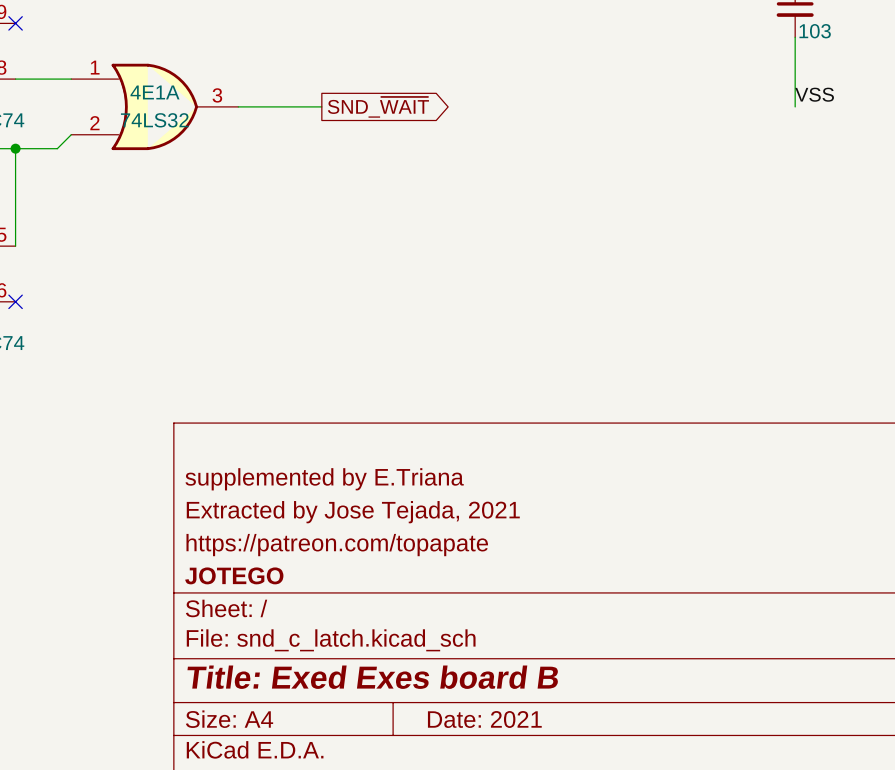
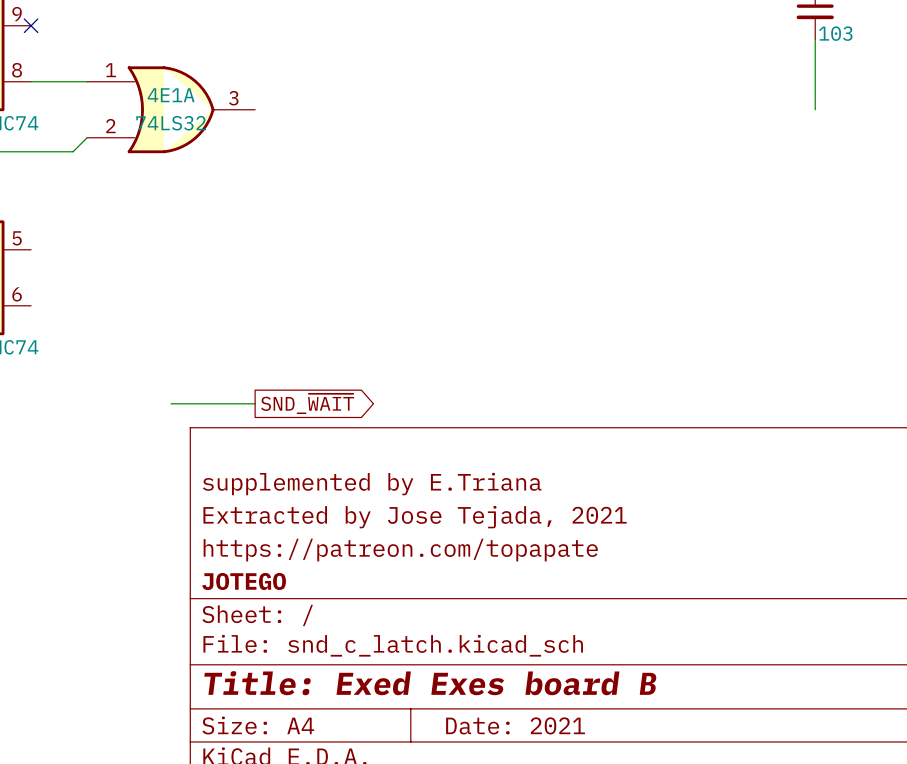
label: VSS (814, 94) -> none
wire: (238, 106) (321, 106) -> none
global label: SND_~{WAIT} (378, 107) -> none
wire: (15, 148) (15, 246) -> none
junction: (15, 148) -> none
no-connect mark: (15, 301) -> none
wire: none -> (171, 403) (255, 403)
global label: none -> SND_~{WAIT} (307, 403)

